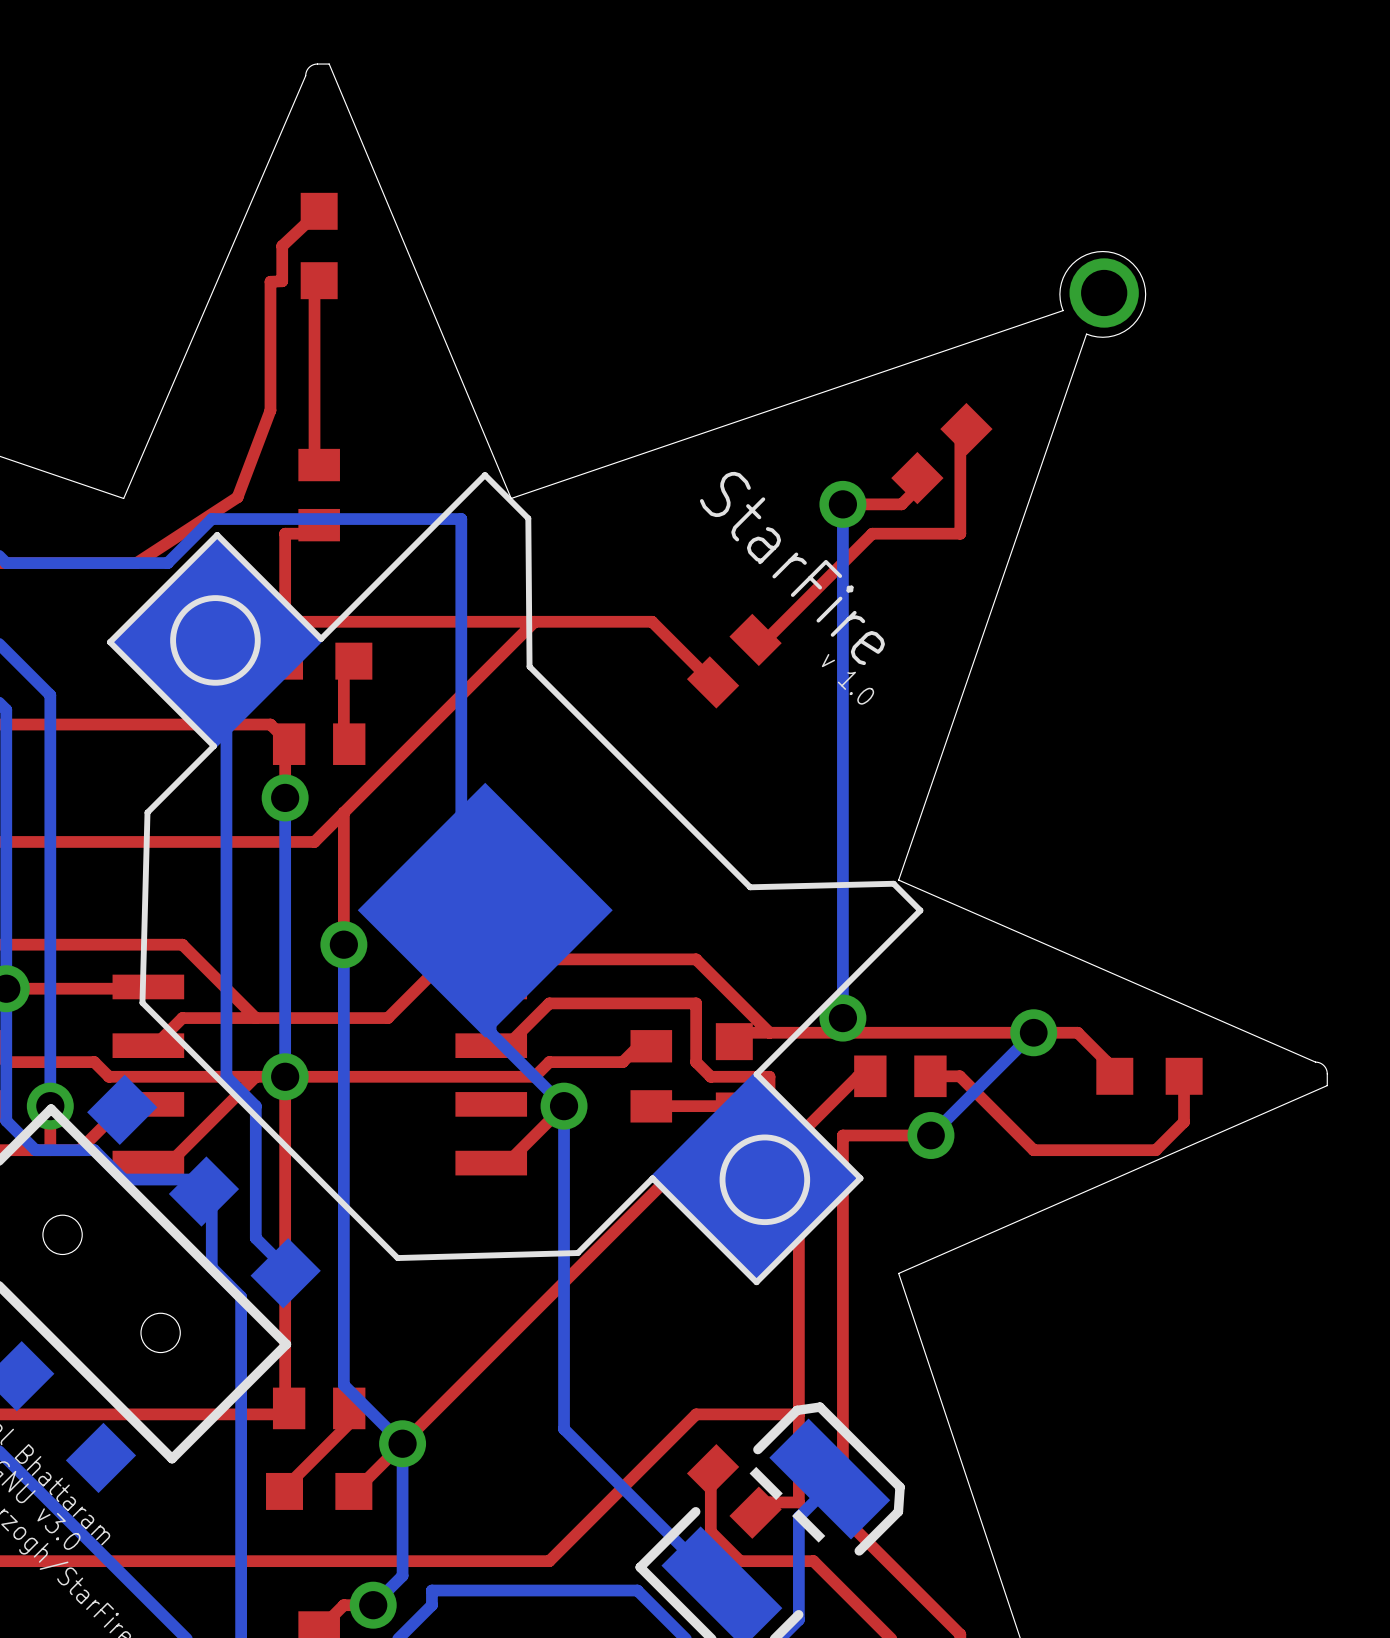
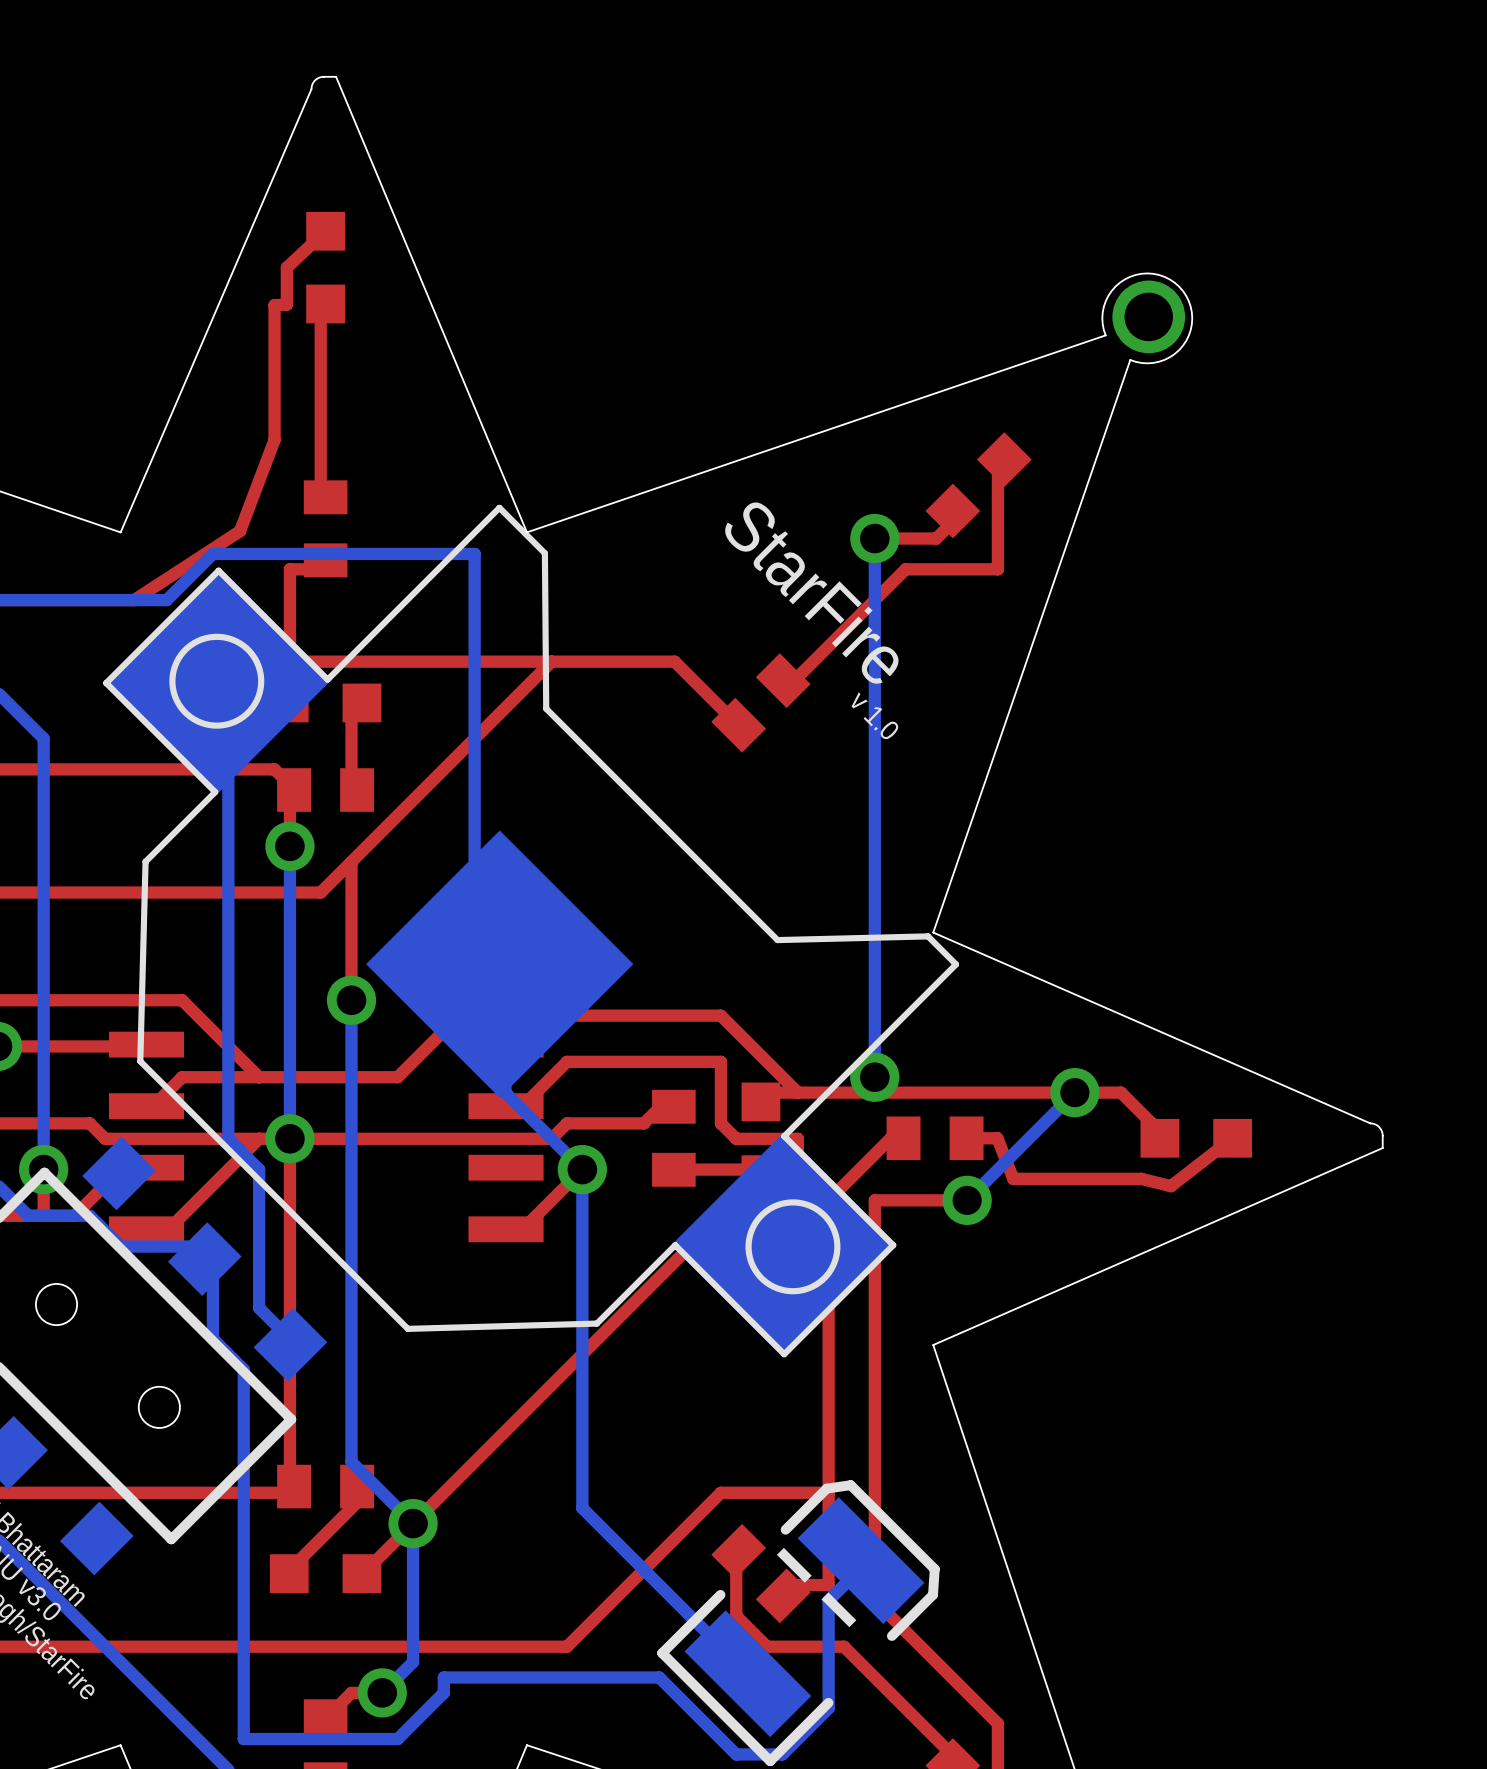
top track: (1184, 1076) (1184, 1122) (1155, 1150) (1033, 1150) (959, 1076) -> (1232, 1138) (1170, 1186) (1141, 1178) (1013, 1178) (997, 1138)

